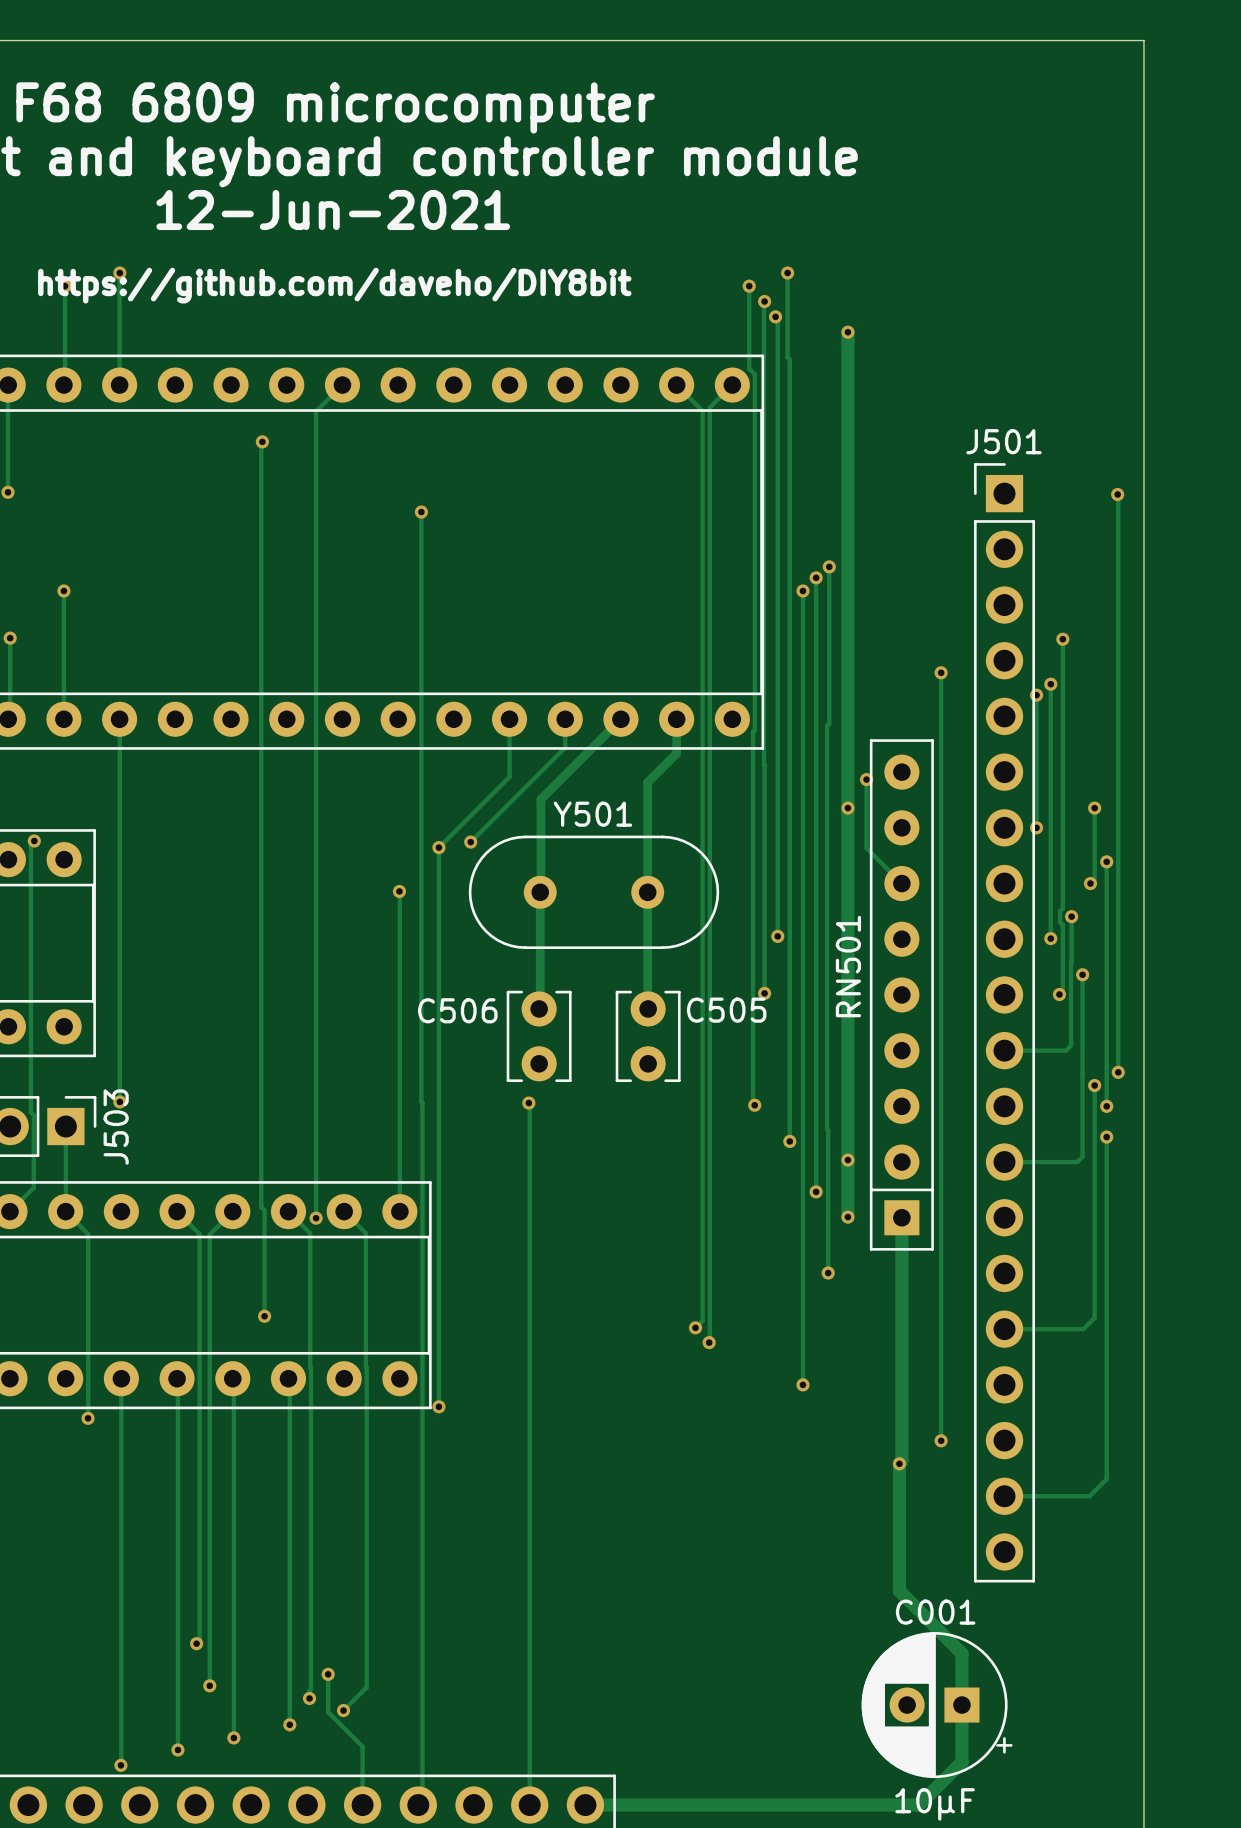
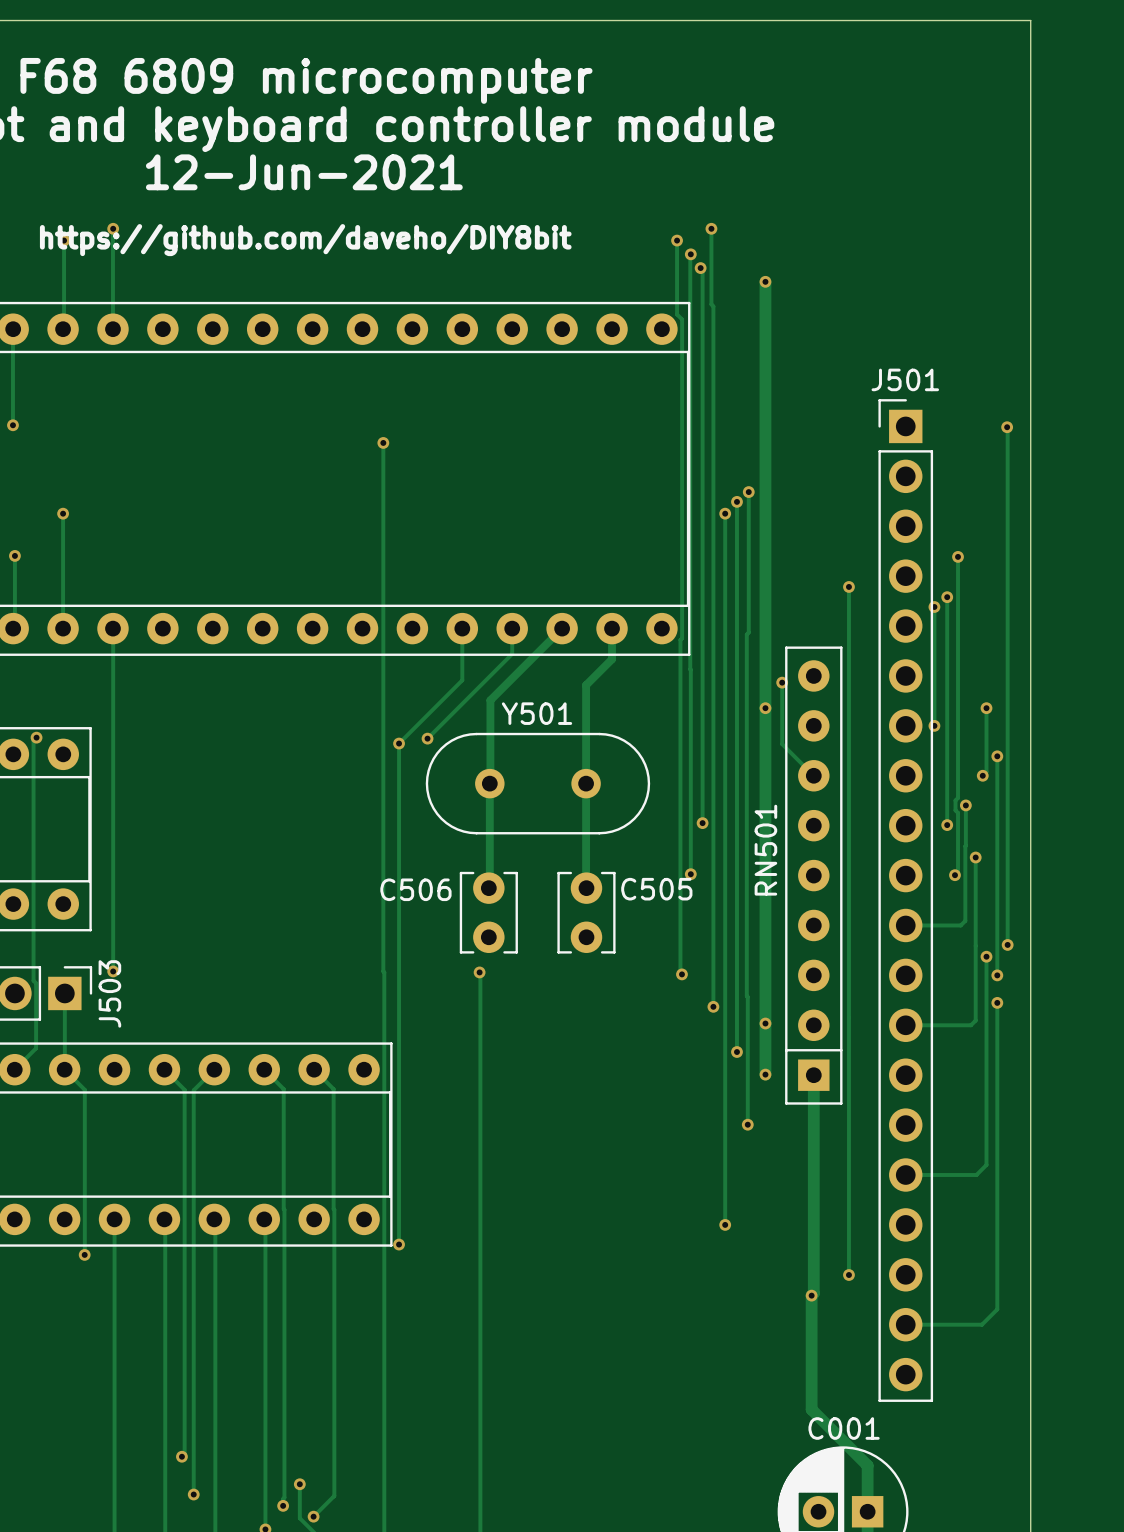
track: (342, 385) (316, 411) (316, 1218) -> none
track: (676, 385) (702, 411) (702, 1320) (695, 1327) -> none
track: (732, 385) (709, 407) (709, 1342) -> none
track: (262, 441) (261, 1207) (264, 1210) (264, 1316) -> none
via: (262, 441) -> none
track: (399, 891) (399, 1211) -> none
via: (399, 891) -> none
via: (316, 1218) -> none
via: (264, 1316) -> none
via: (695, 1327) -> none
via: (709, 1342) -> none

